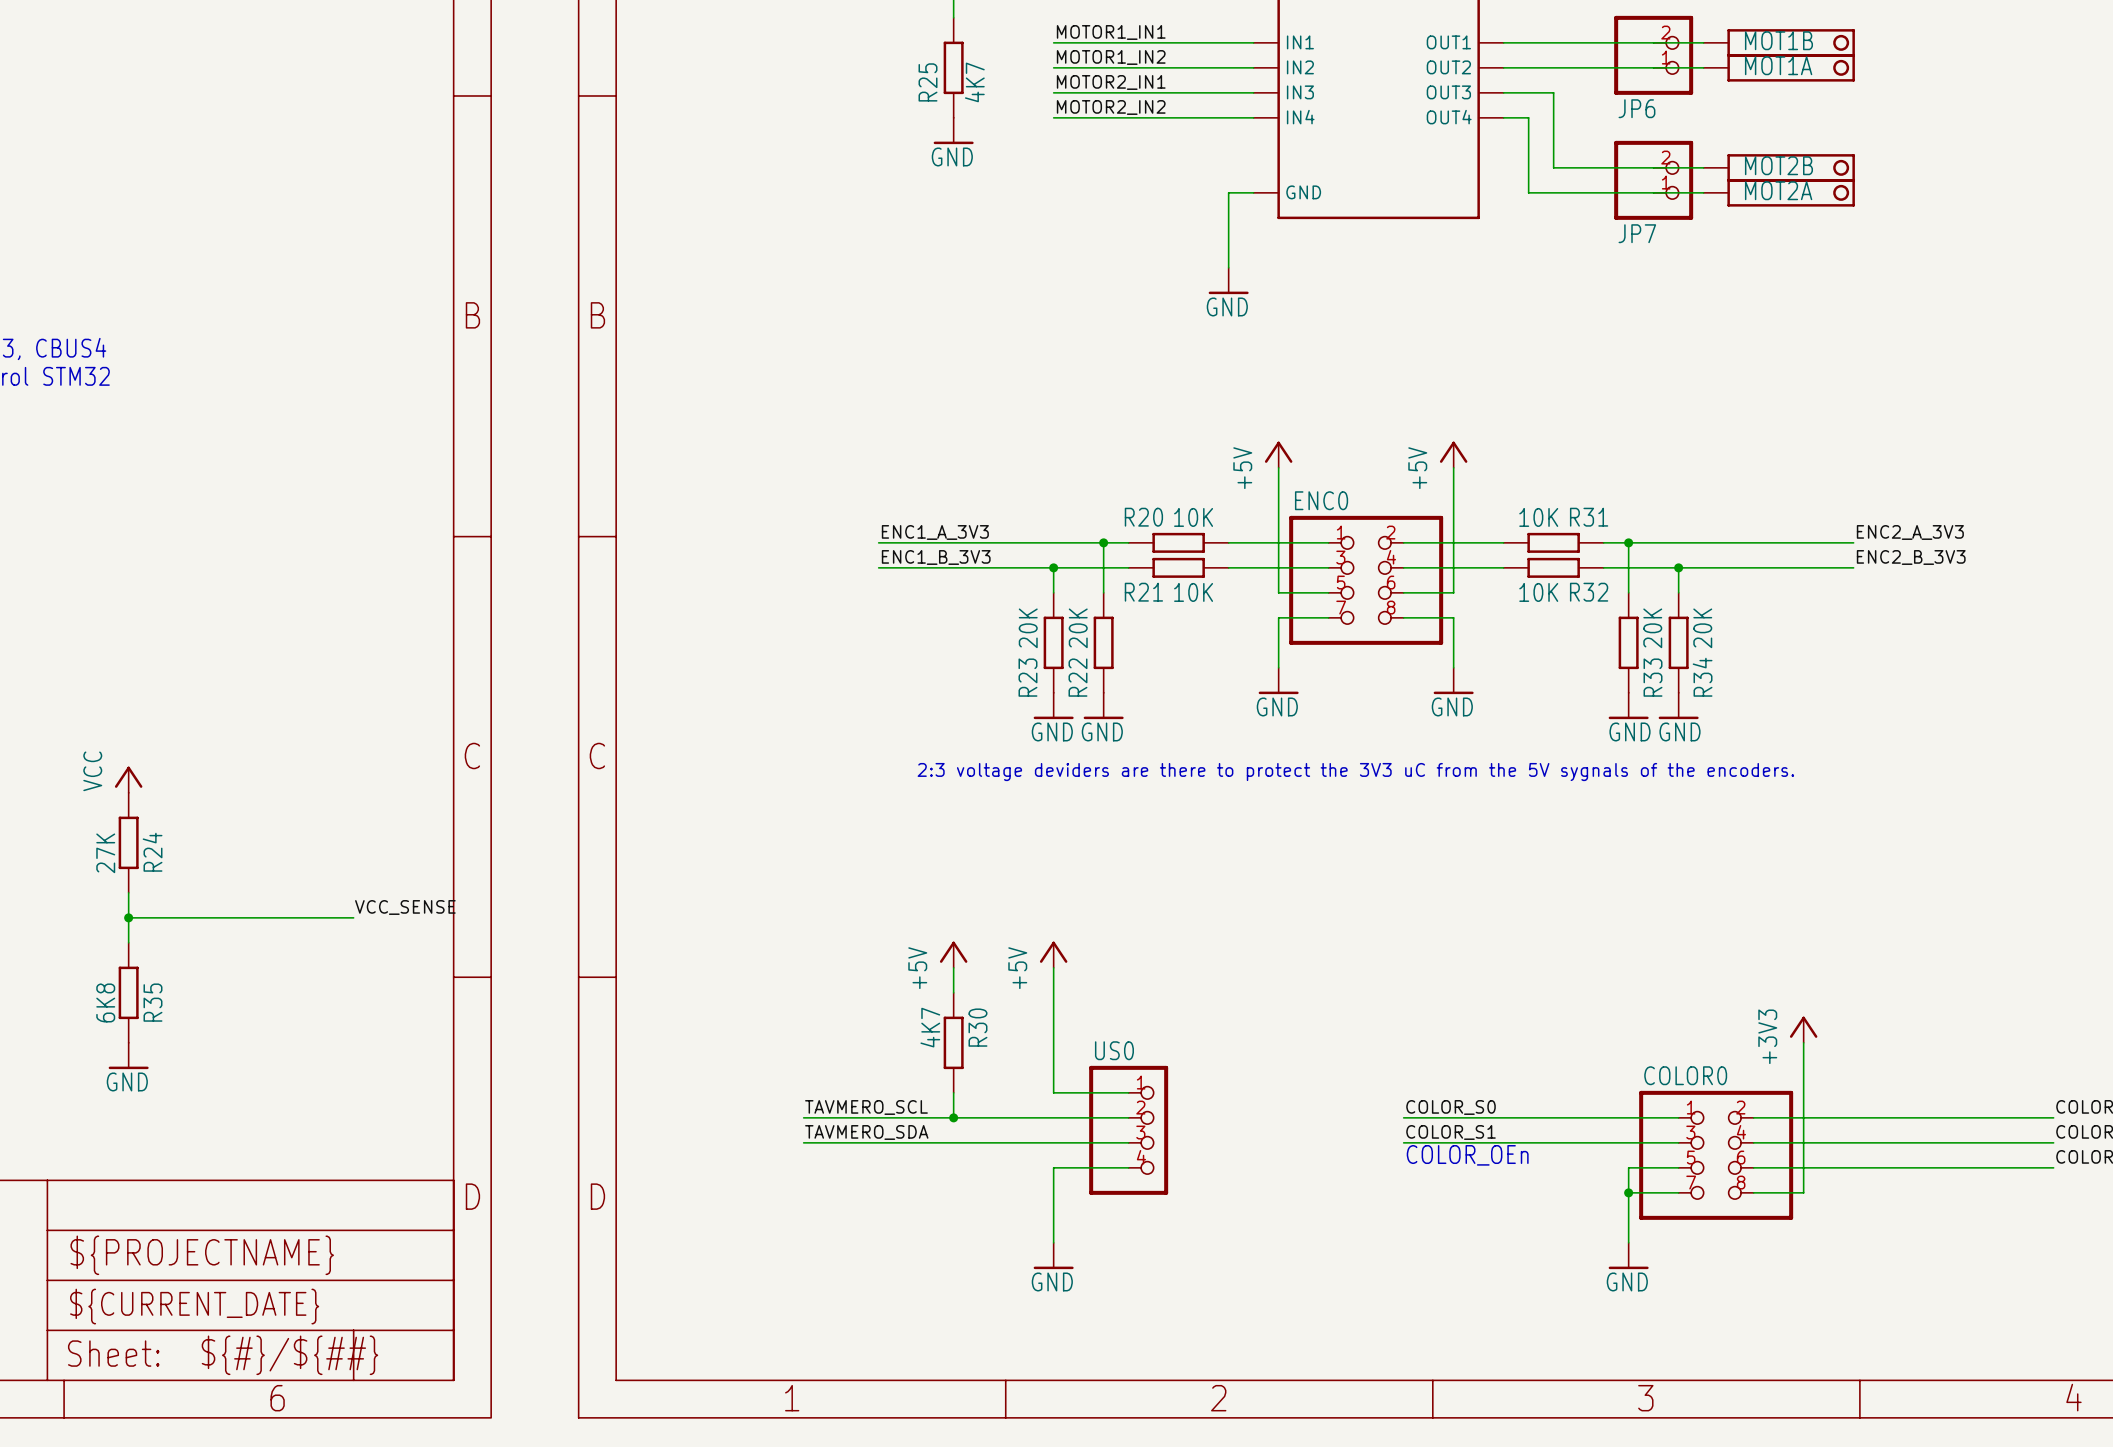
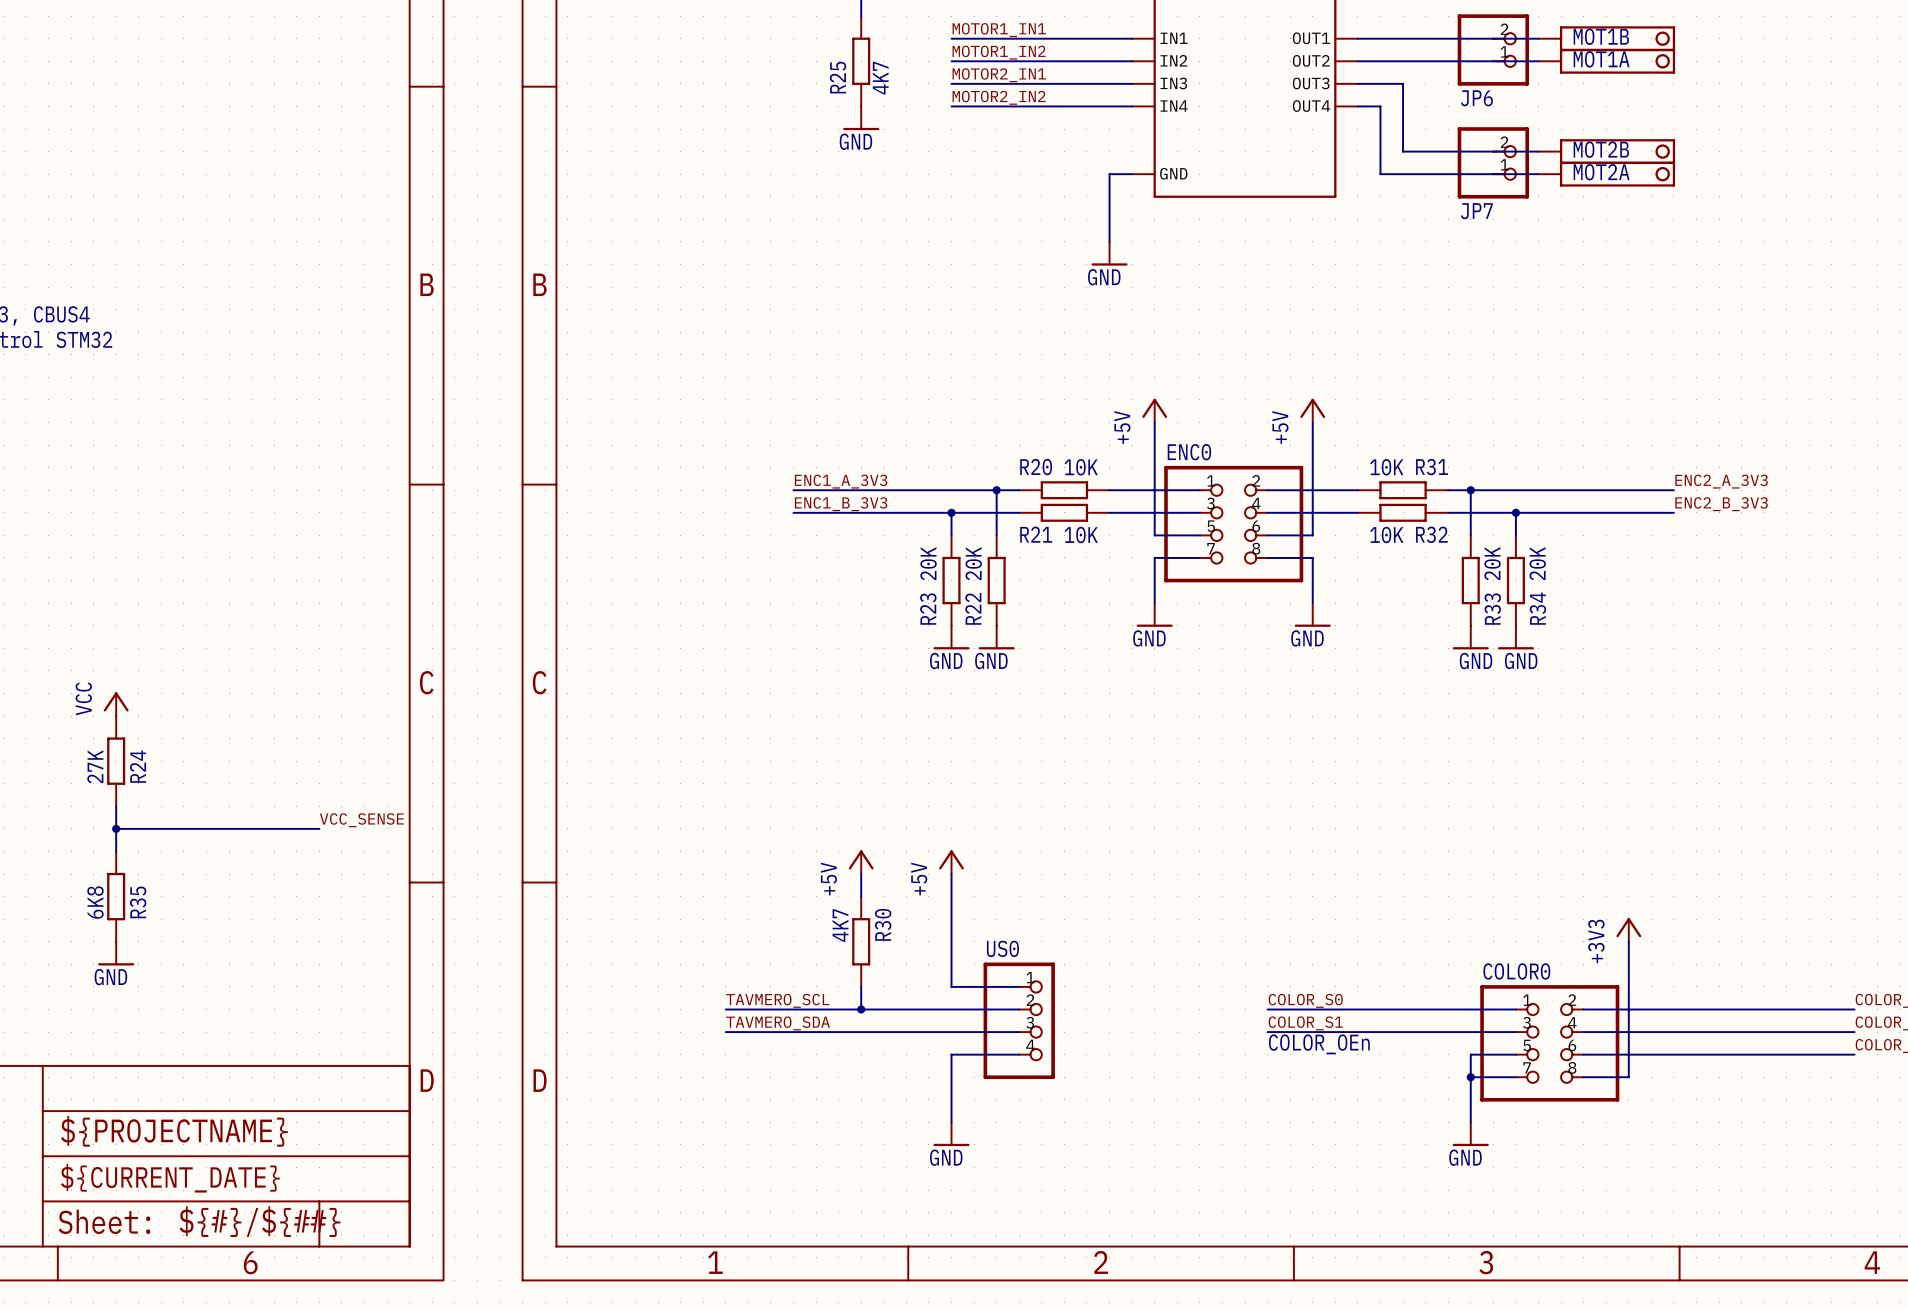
text: 2:3 voltage deviders are there to protect the 3V3 uC from the 5V sygnals of the encoders. (1355, 772) -> none

